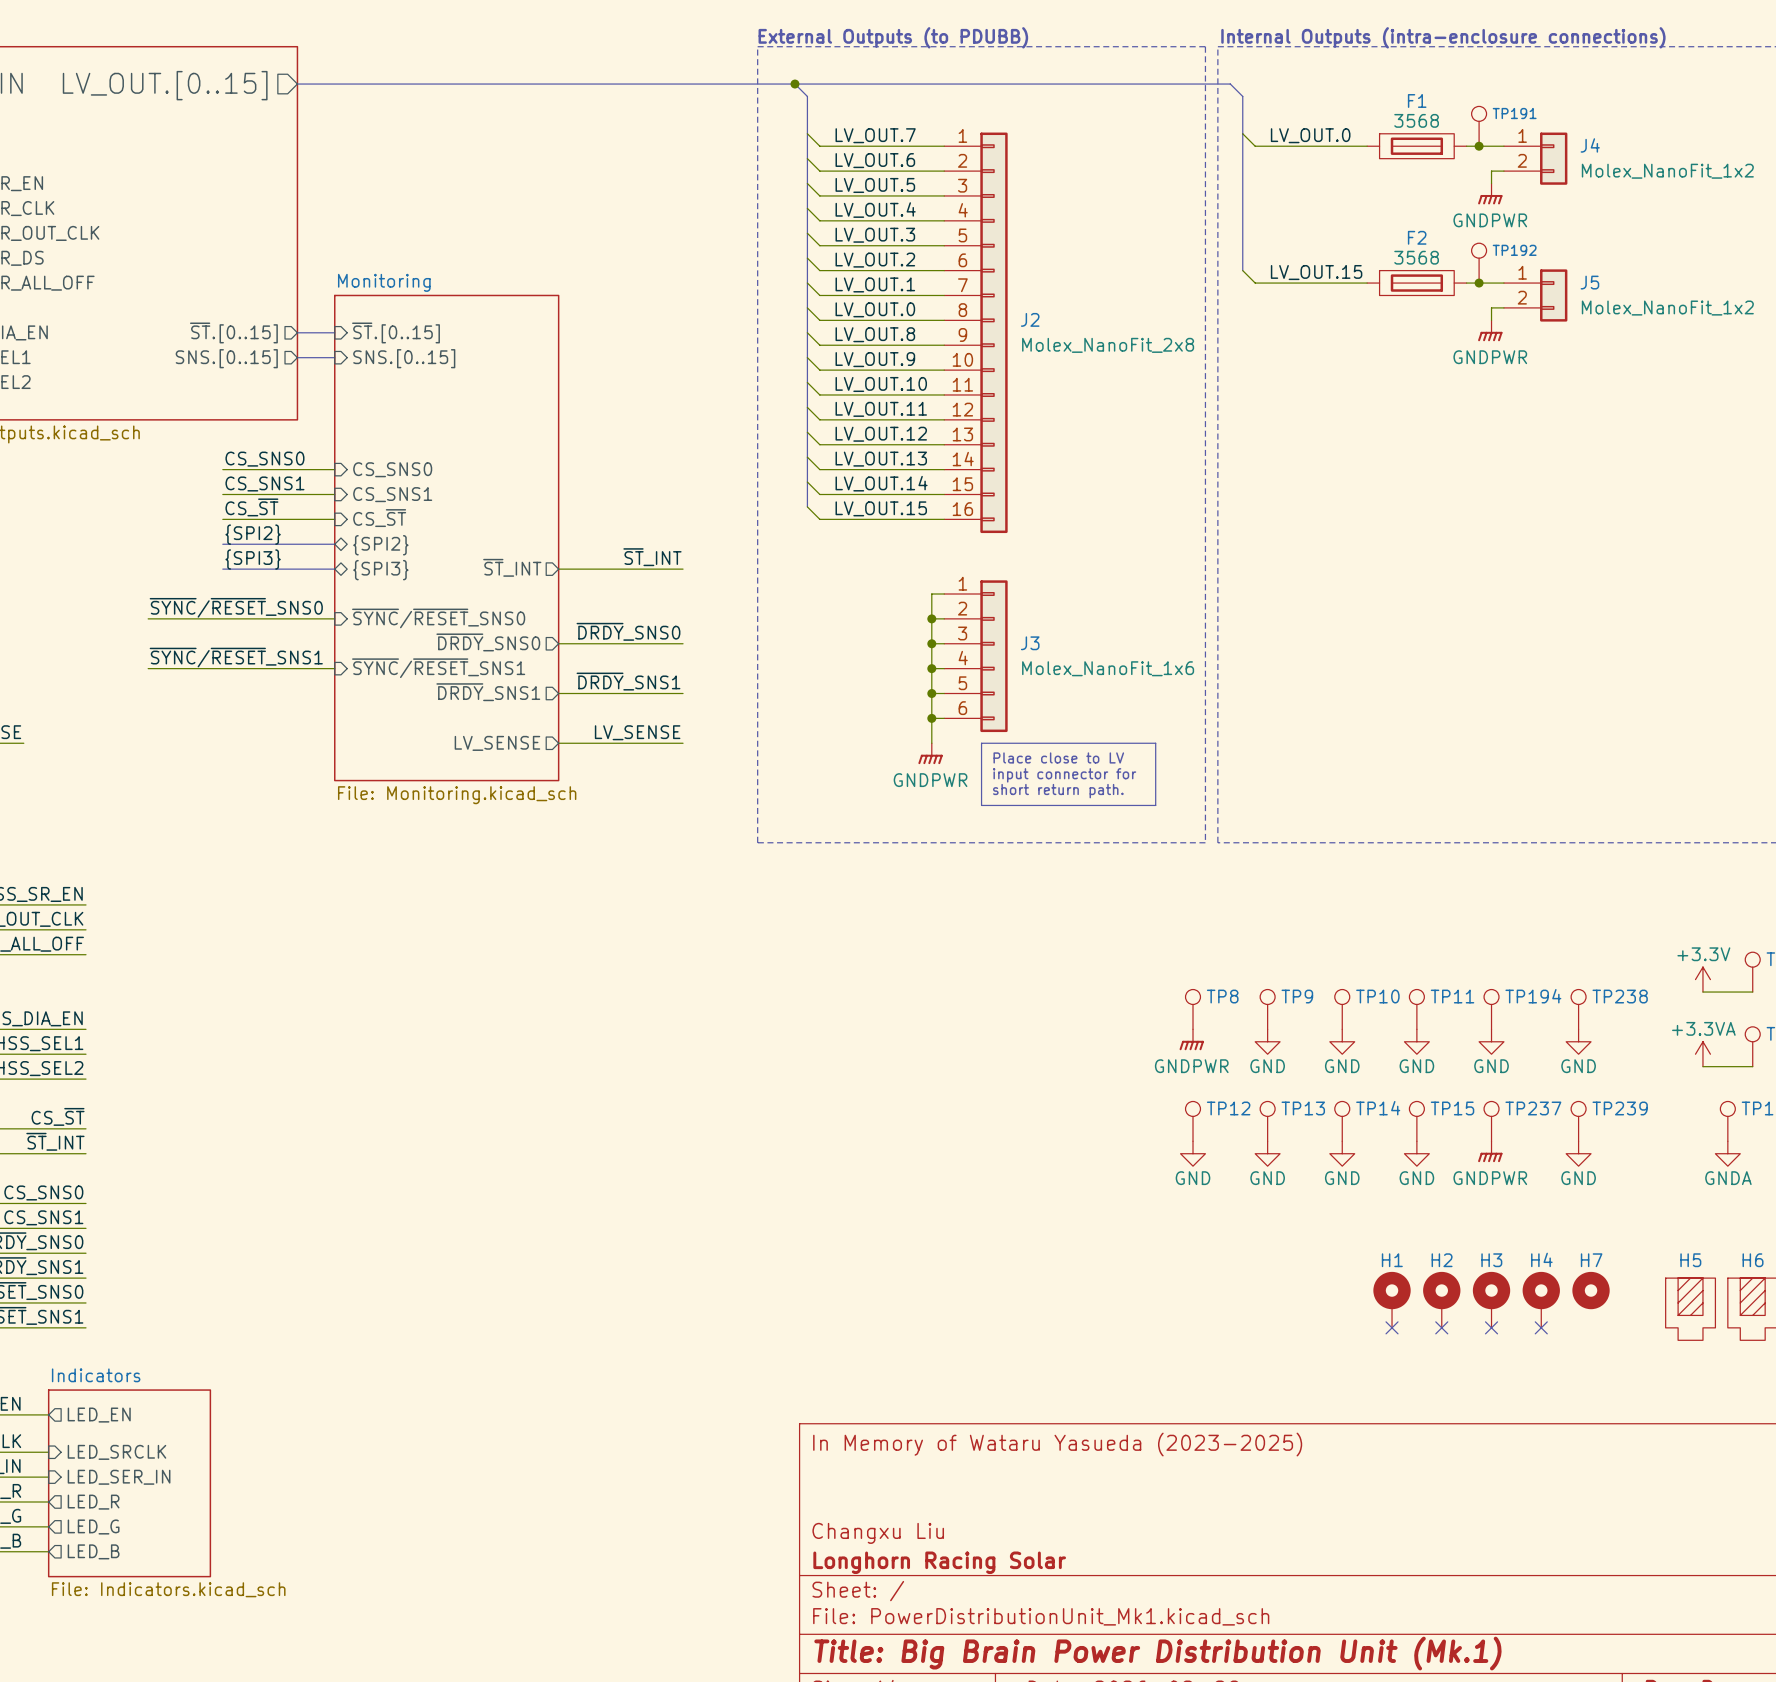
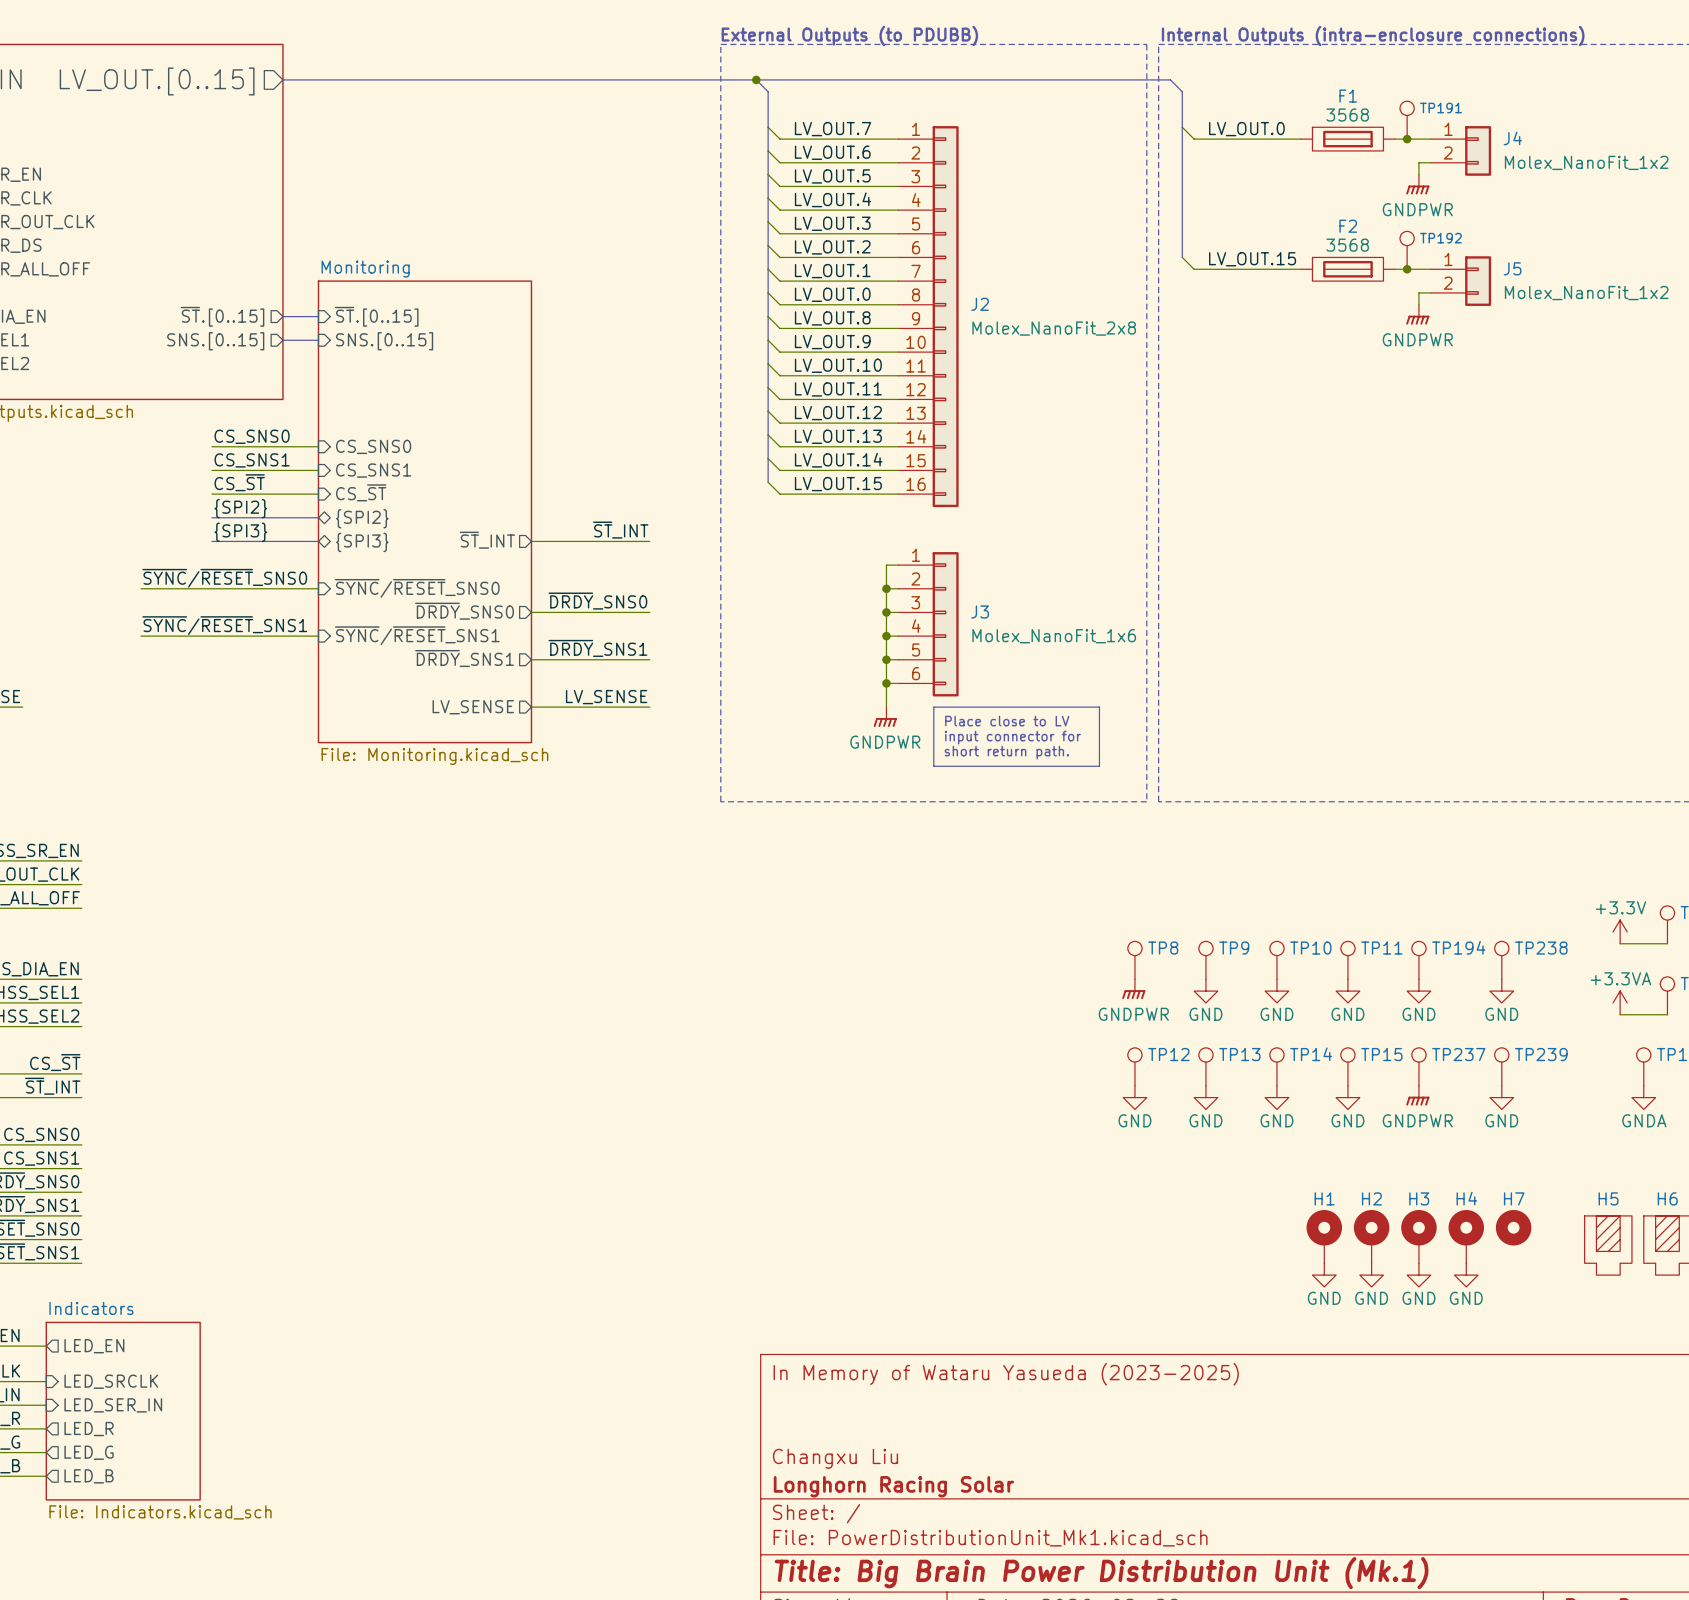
no-connect mark: (1392, 1327) -> none
no-connect mark: (1441, 1327) -> none
no-connect mark: (1491, 1327) -> none
no-connect mark: (1541, 1327) -> none
power symbol: none -> GND (1324, 1275)
power symbol: none -> GND (1371, 1275)
power symbol: none -> GND (1418, 1275)
power symbol: none -> GND (1466, 1275)

